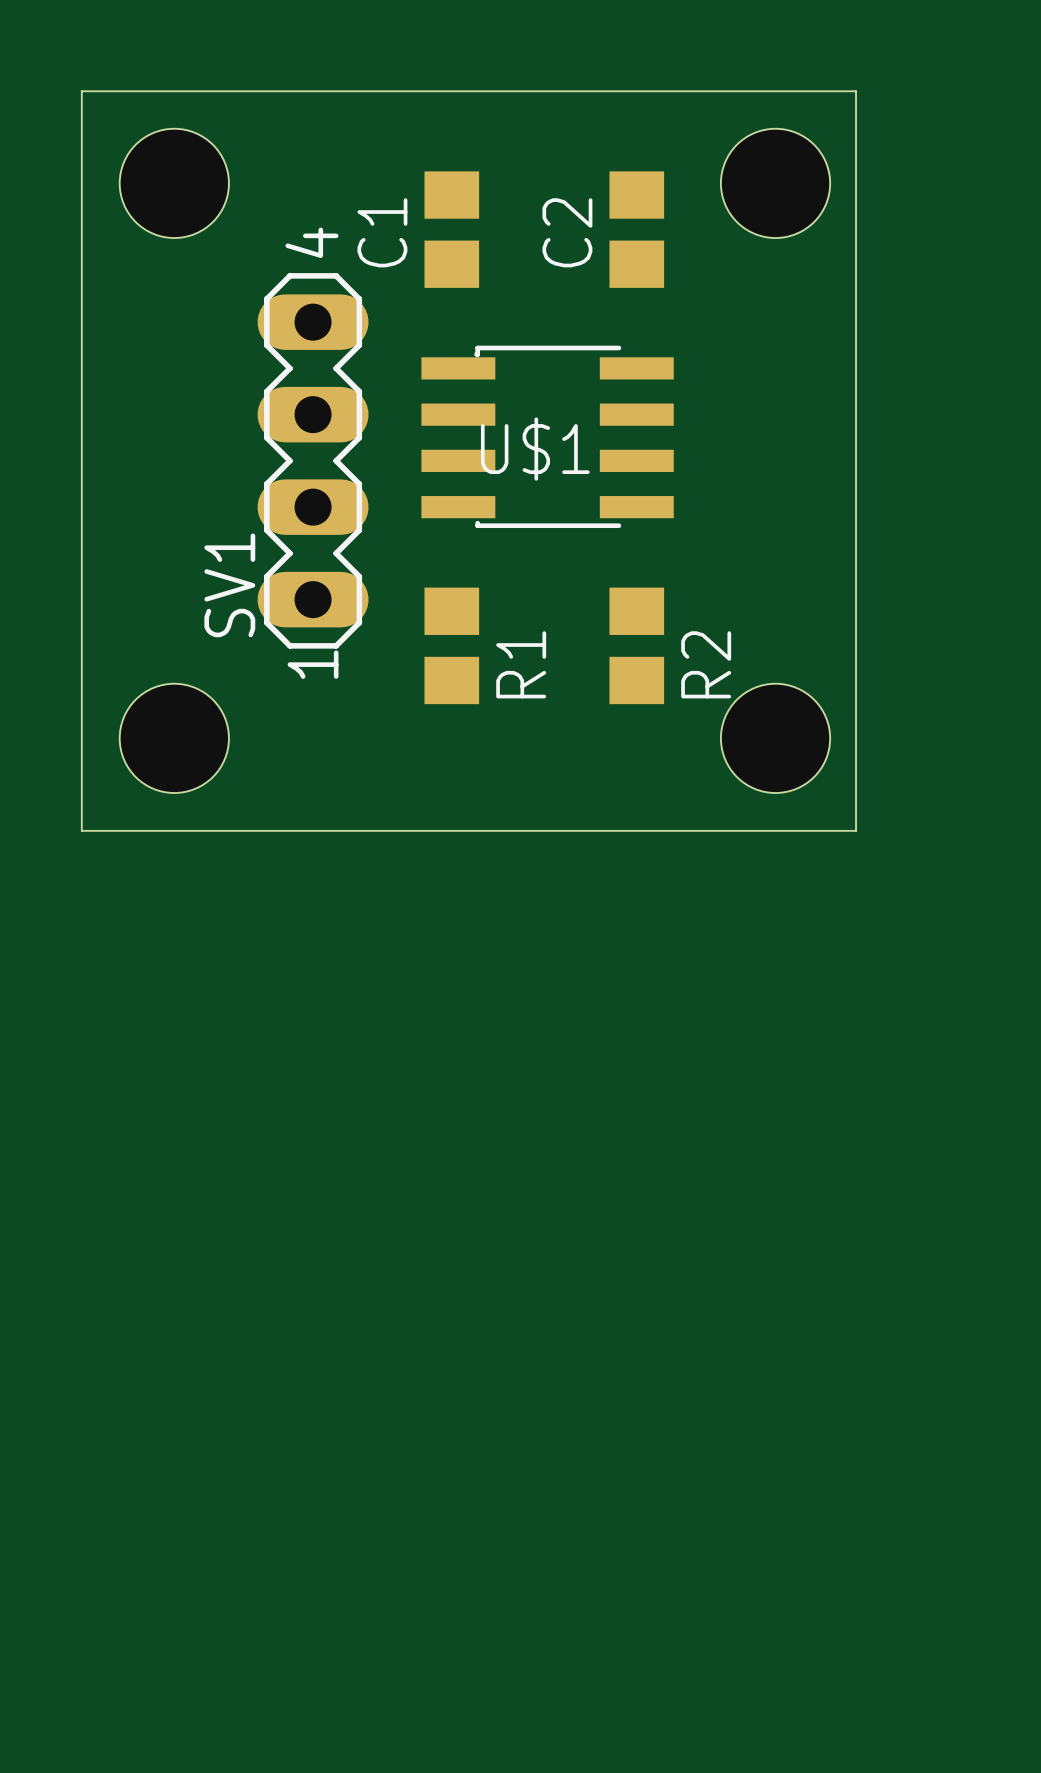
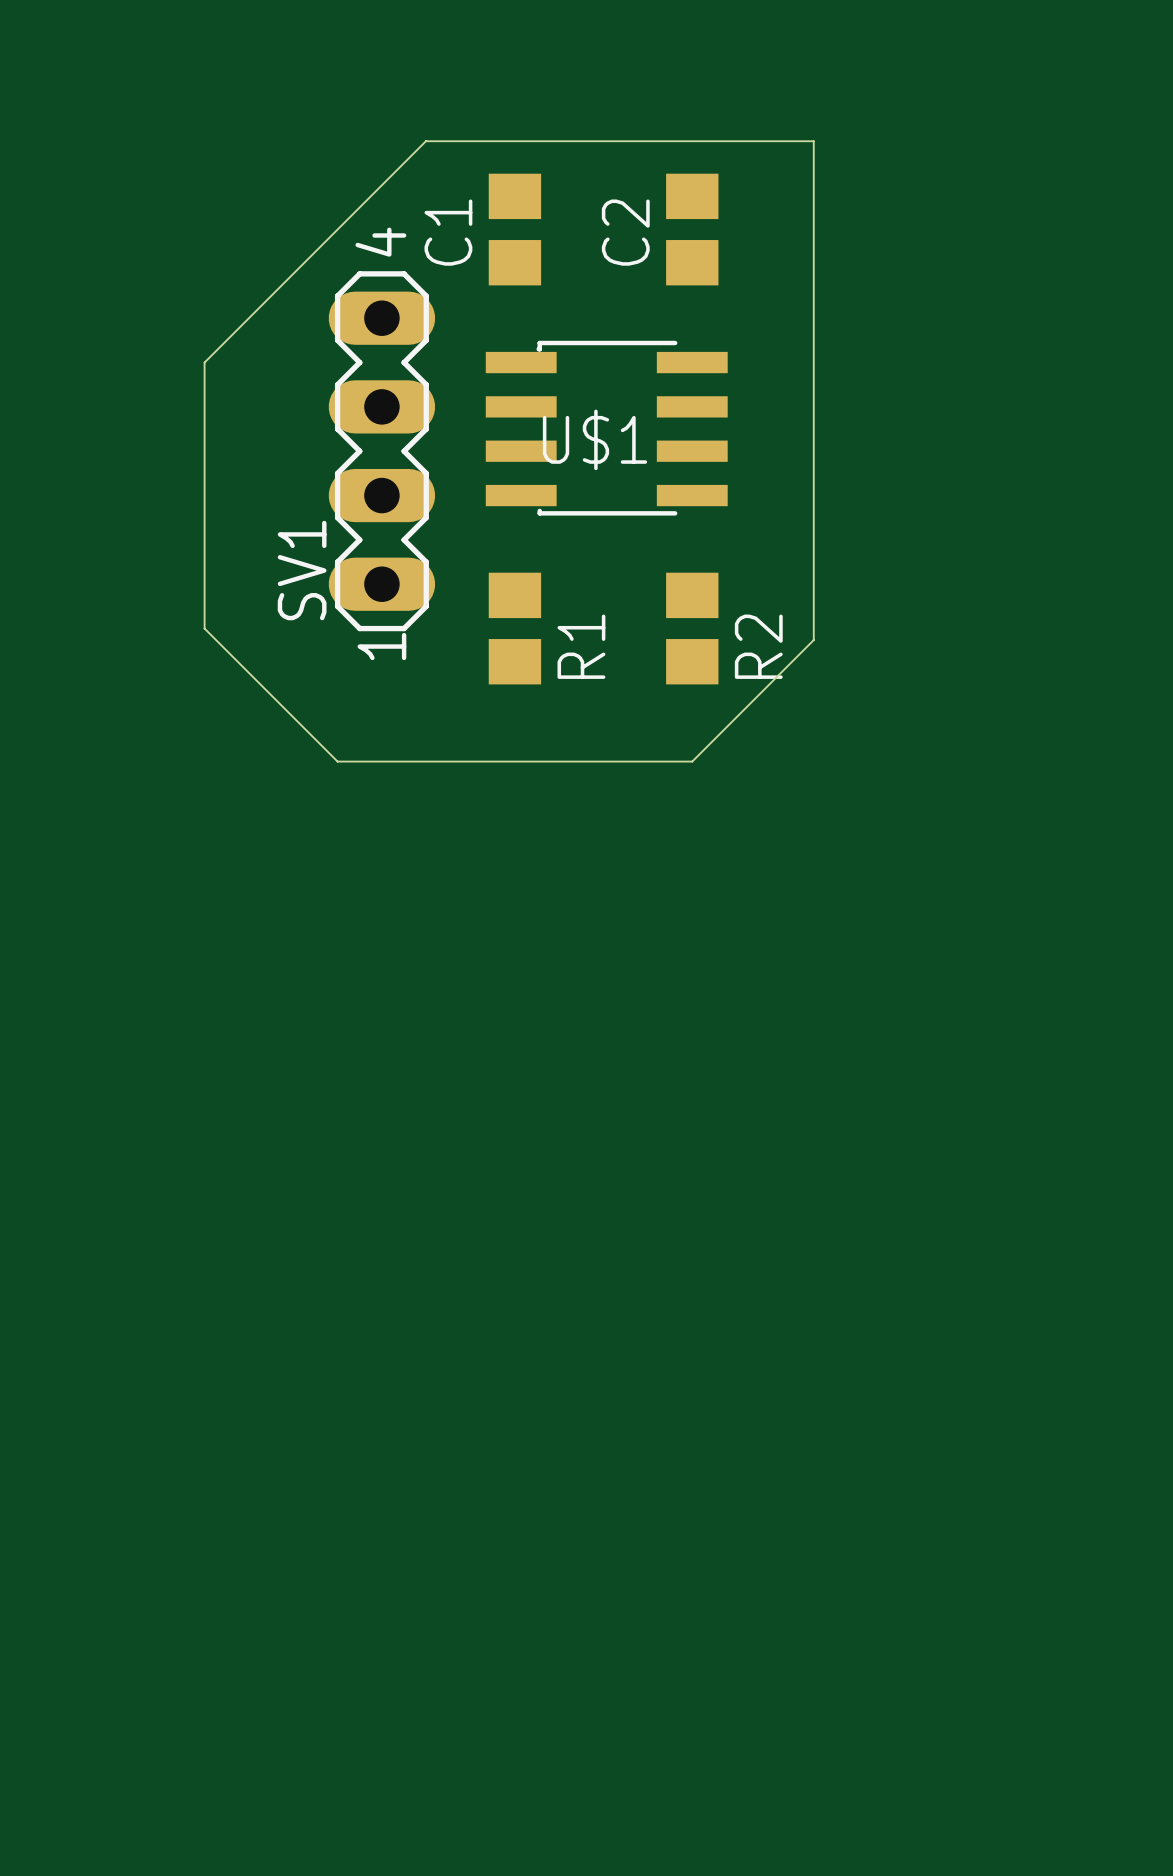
board edge: (81, 91) (81, 830) (856, 830) (856, 91) (81, 91) -> (425, 141) (204, 362) (204, 628) (337, 761) (692, 761) (813, 640) (813, 141) (425, 141)
hole: (174, 183) -> none
hole: (775, 183) -> none
hole: (174, 738) -> none
hole: (775, 738) -> none

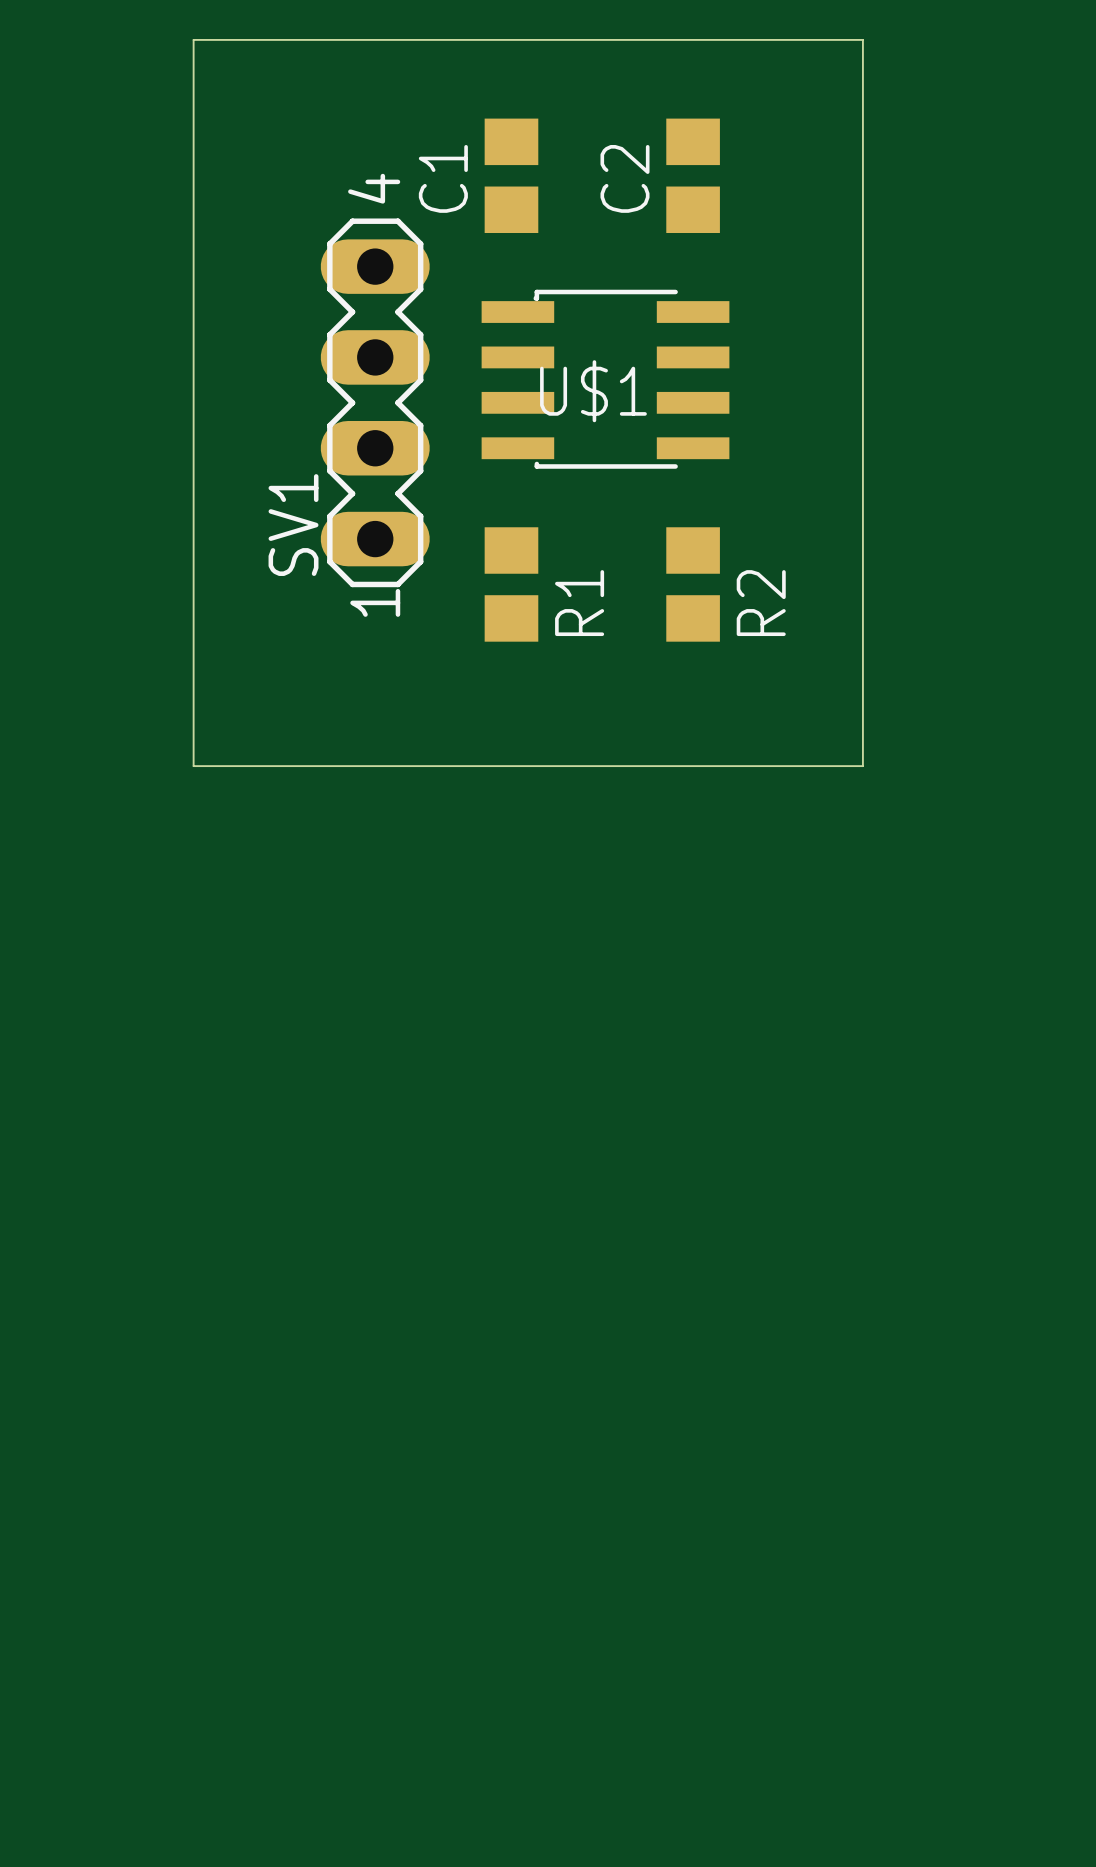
board edge: (204, 362) (425, 141) (813, 141) (813, 640) (692, 761) (337, 761) (204, 628) -> (193, 312) (193, 39) (862, 39) (862, 766) (193, 766) (193, 584)

